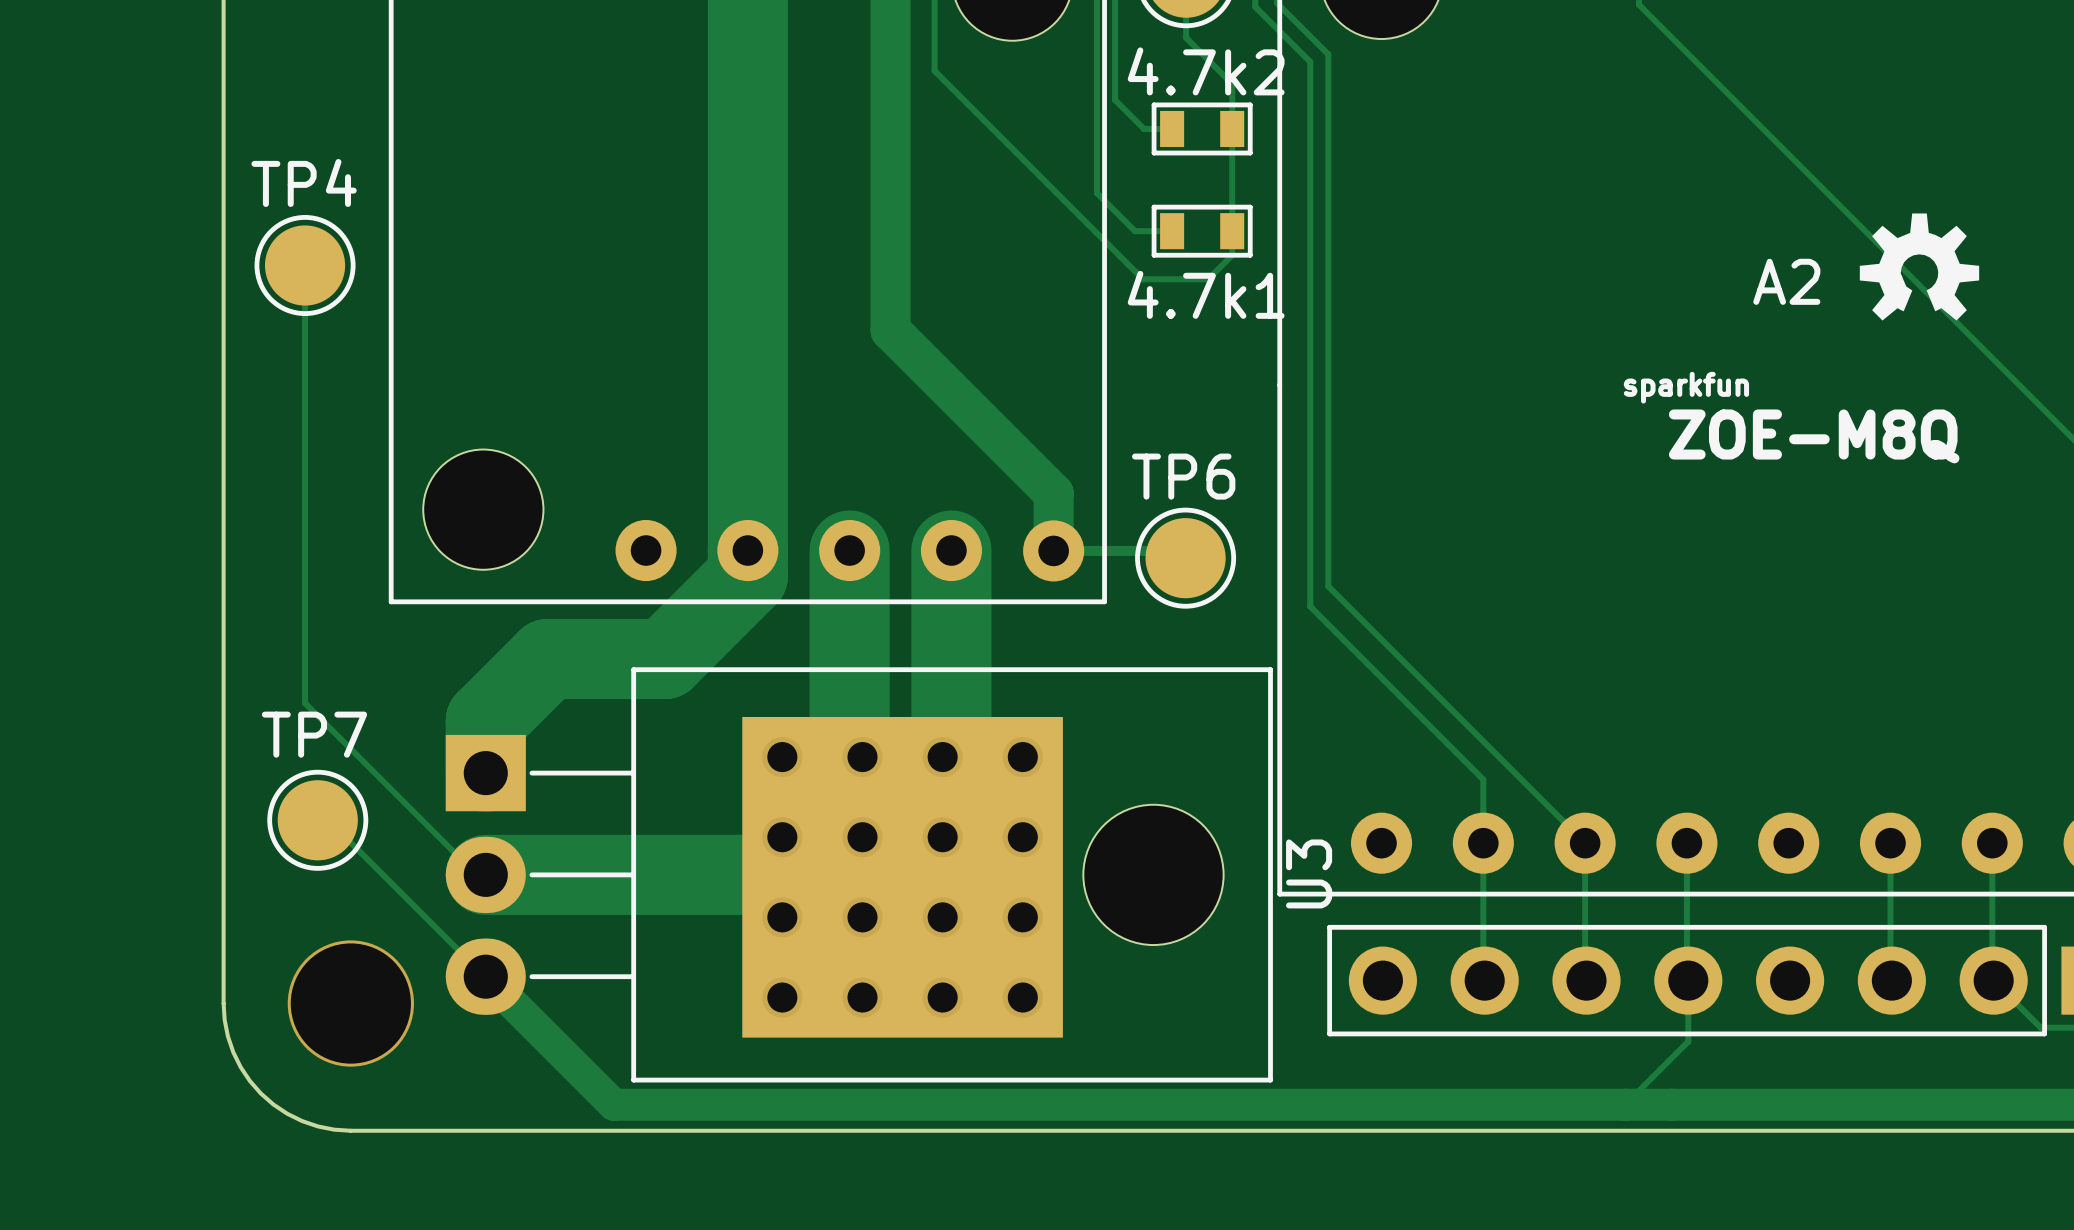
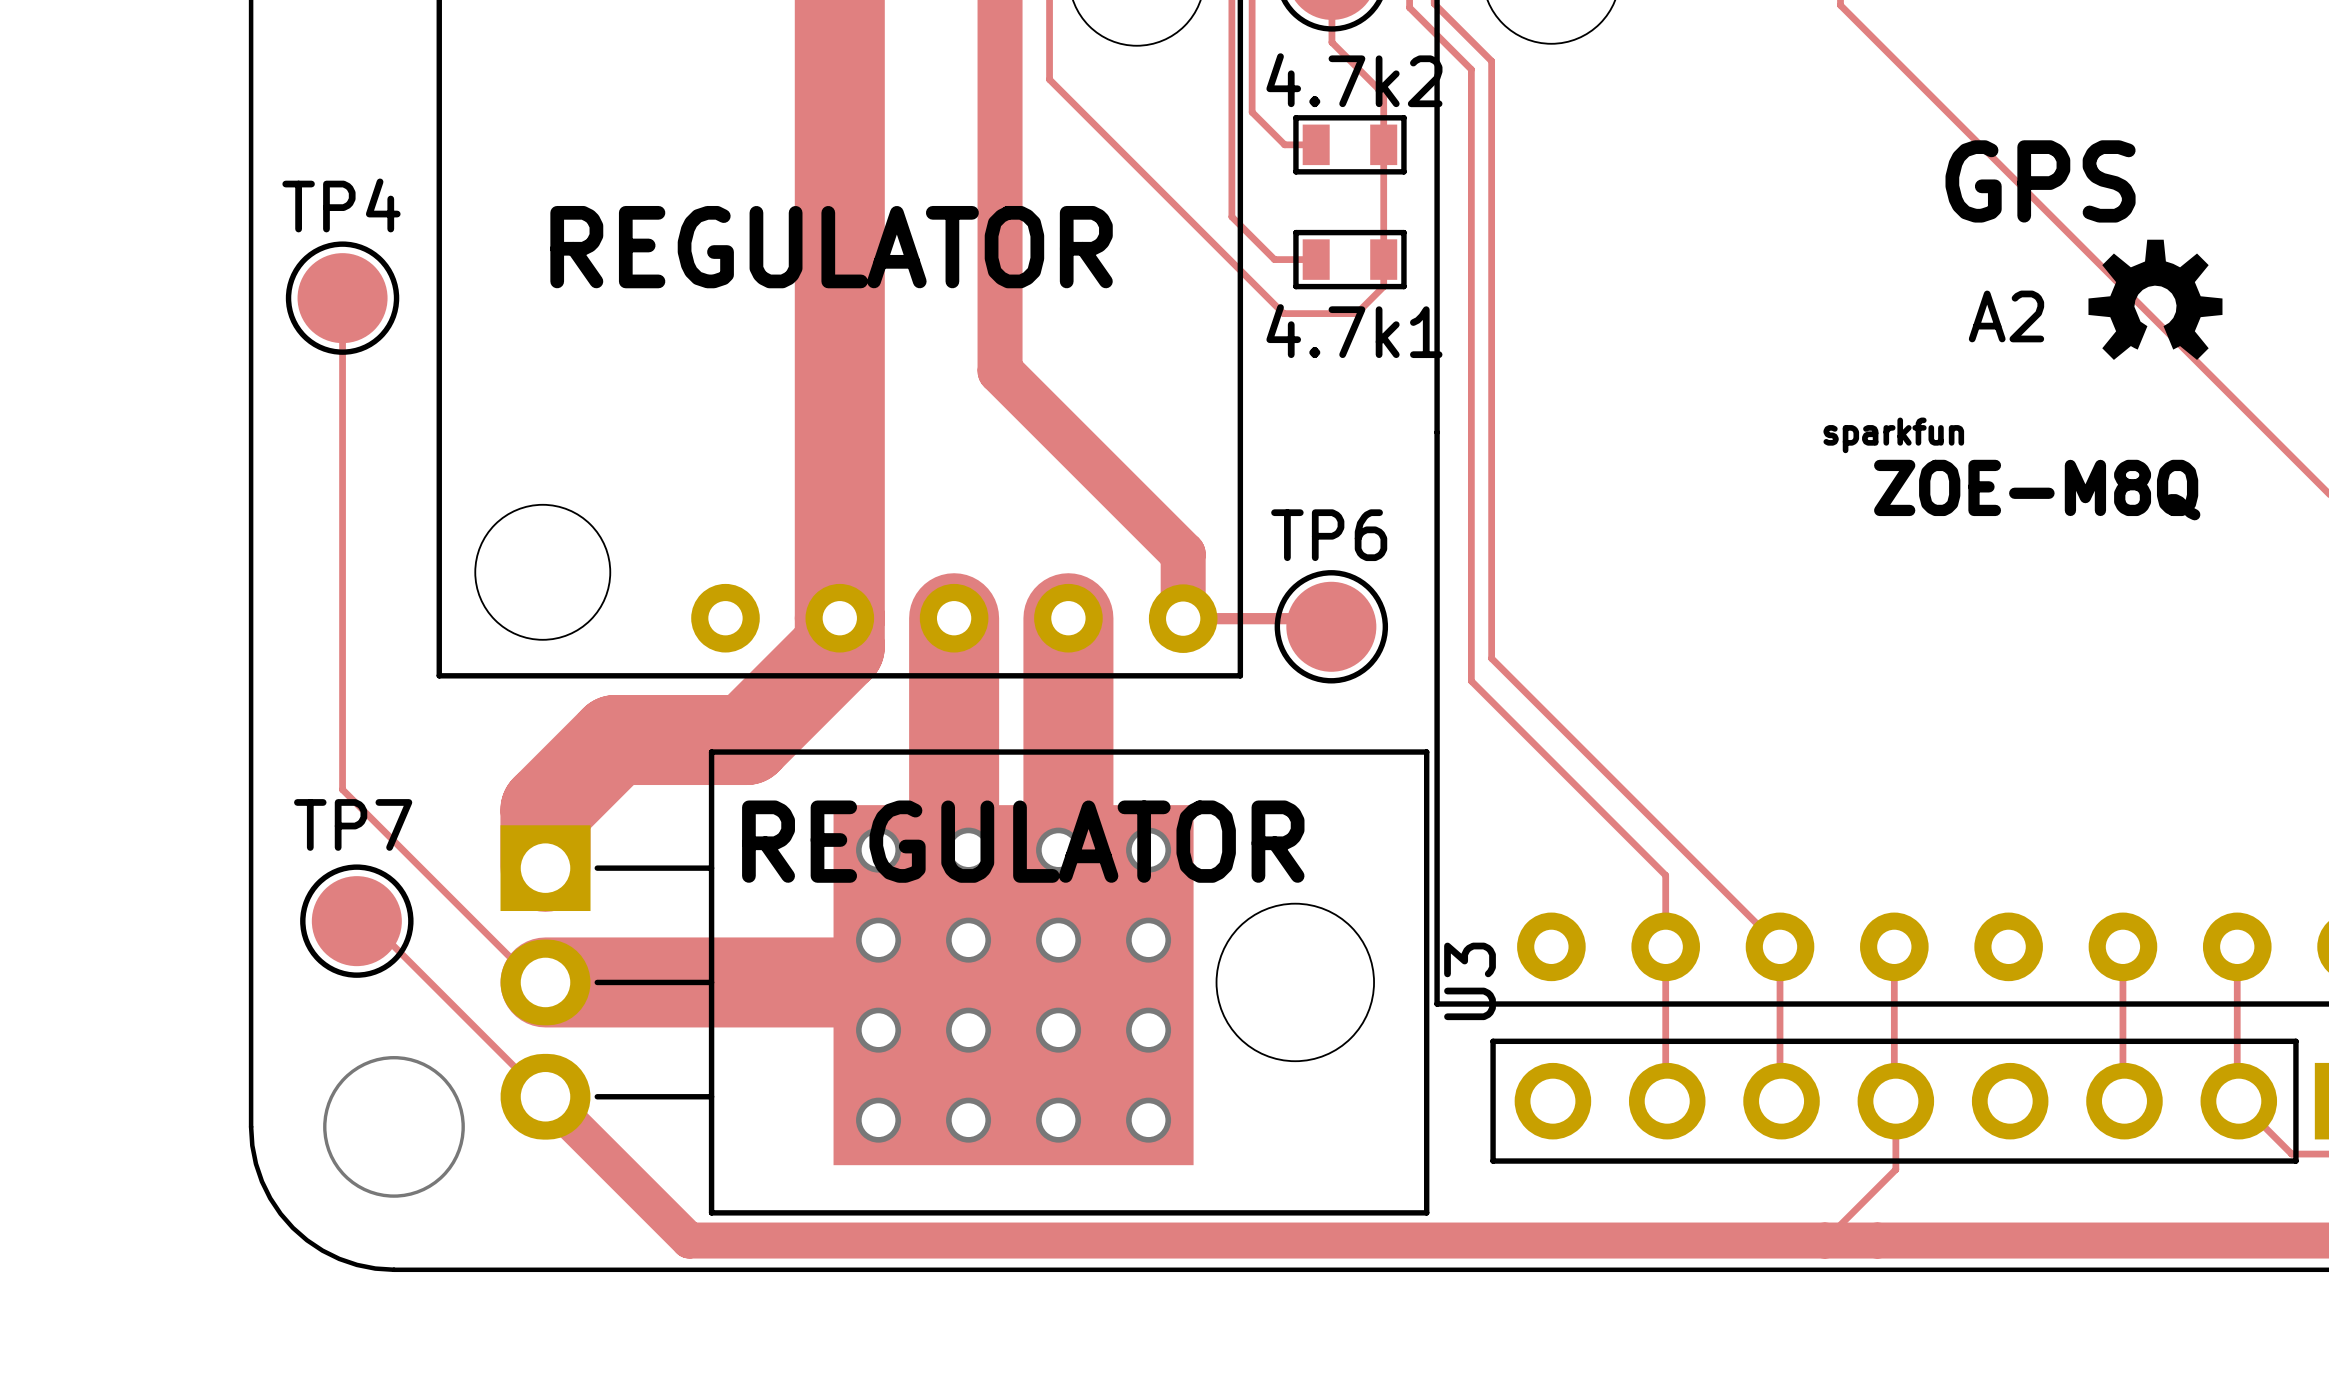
text: none -> GPS (2040, 181)
text: none -> REGULATOR (831, 247)
text: none -> REGULATOR (1023, 841)

